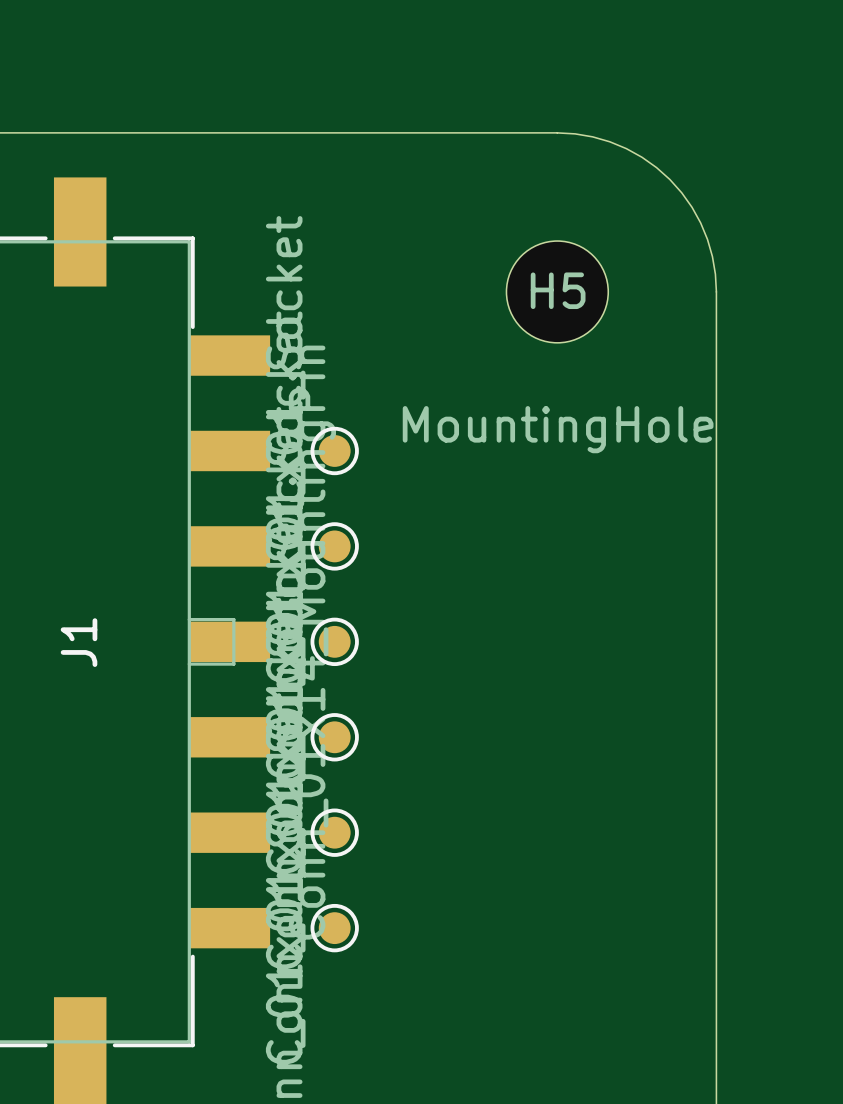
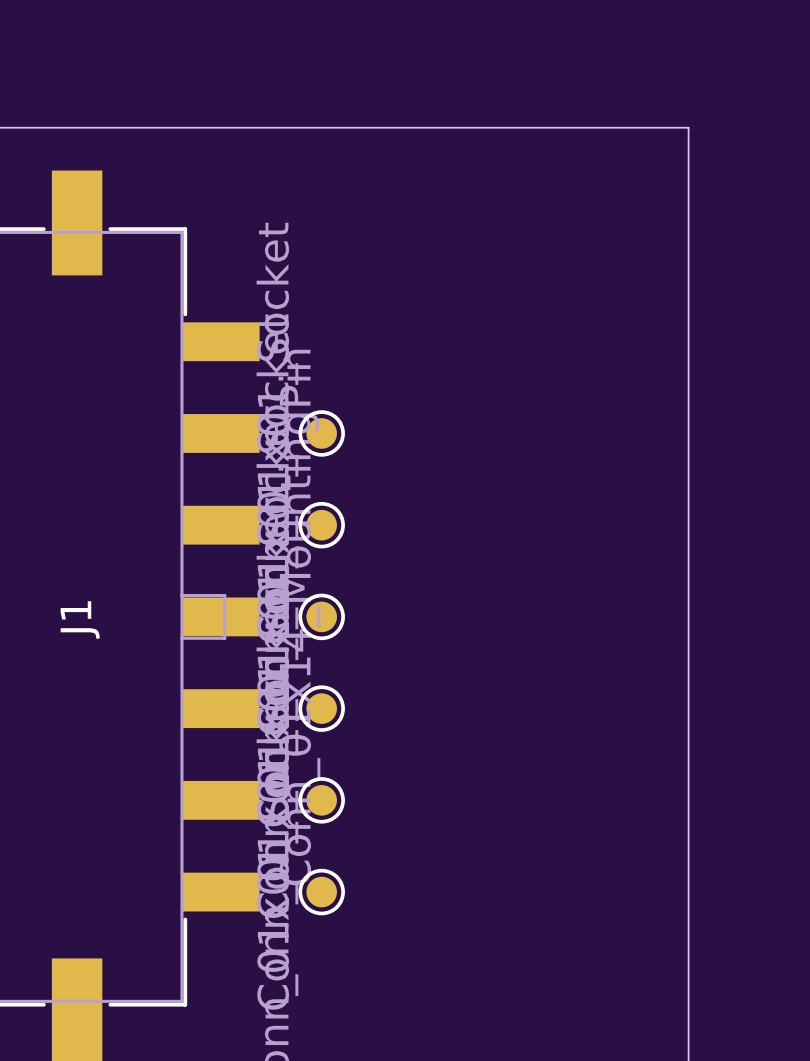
board edge: (557, 132) (592, 136) (626, 148) (656, 167) (669, 179) (681, 192) (700, 222) (712, 256) (716, 291) -> (535, 127) (688, 127) (688, 280)
H5: MountingHole (557, 291) -> none

